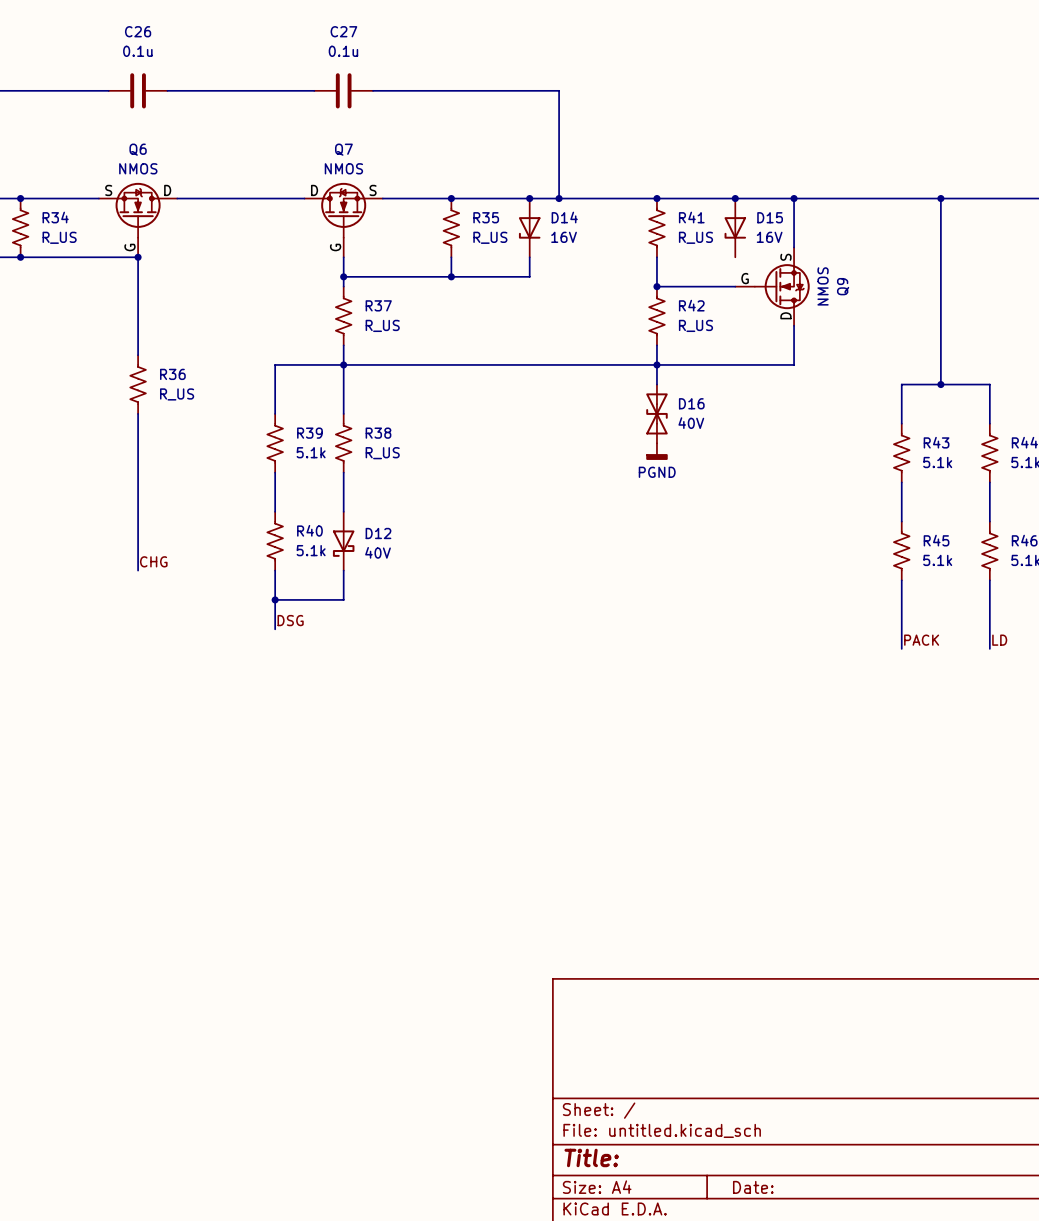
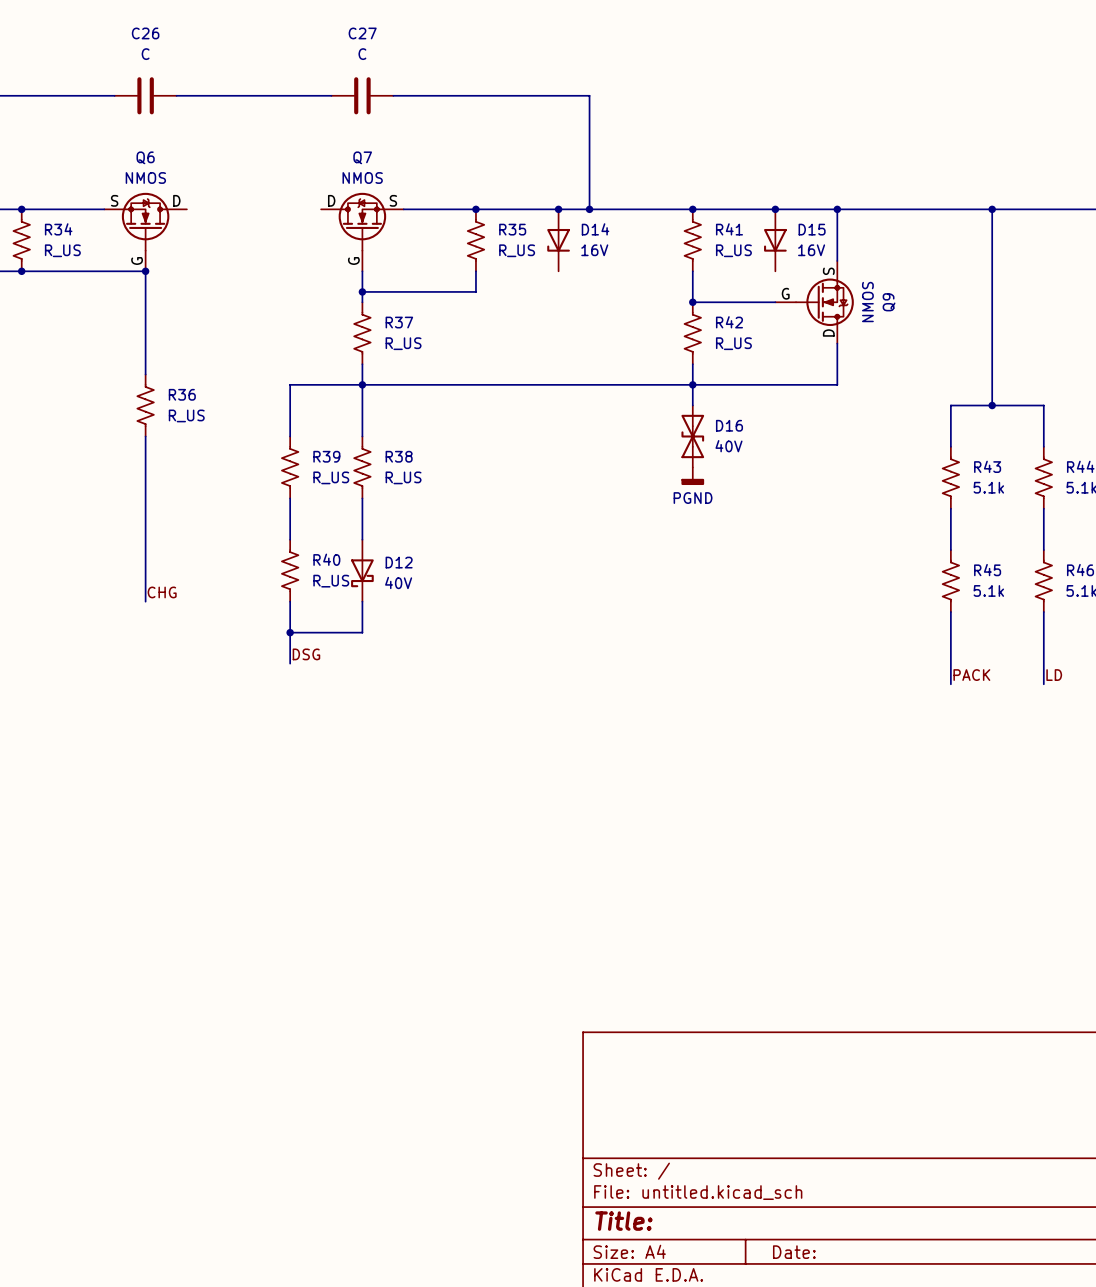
C26 value: 0.1u (137, 51) -> C (145, 54)
C27 value: 0.1u (343, 51) -> C (362, 54)
wire: (177, 198) (304, 198) -> none
wire: (529, 257) (529, 276) (451, 276) -> none
junction: (451, 276) -> none
R39 value: 5.1k (311, 452) -> R_US (331, 477)
R40 value: 5.1k (311, 550) -> R_US (331, 581)

